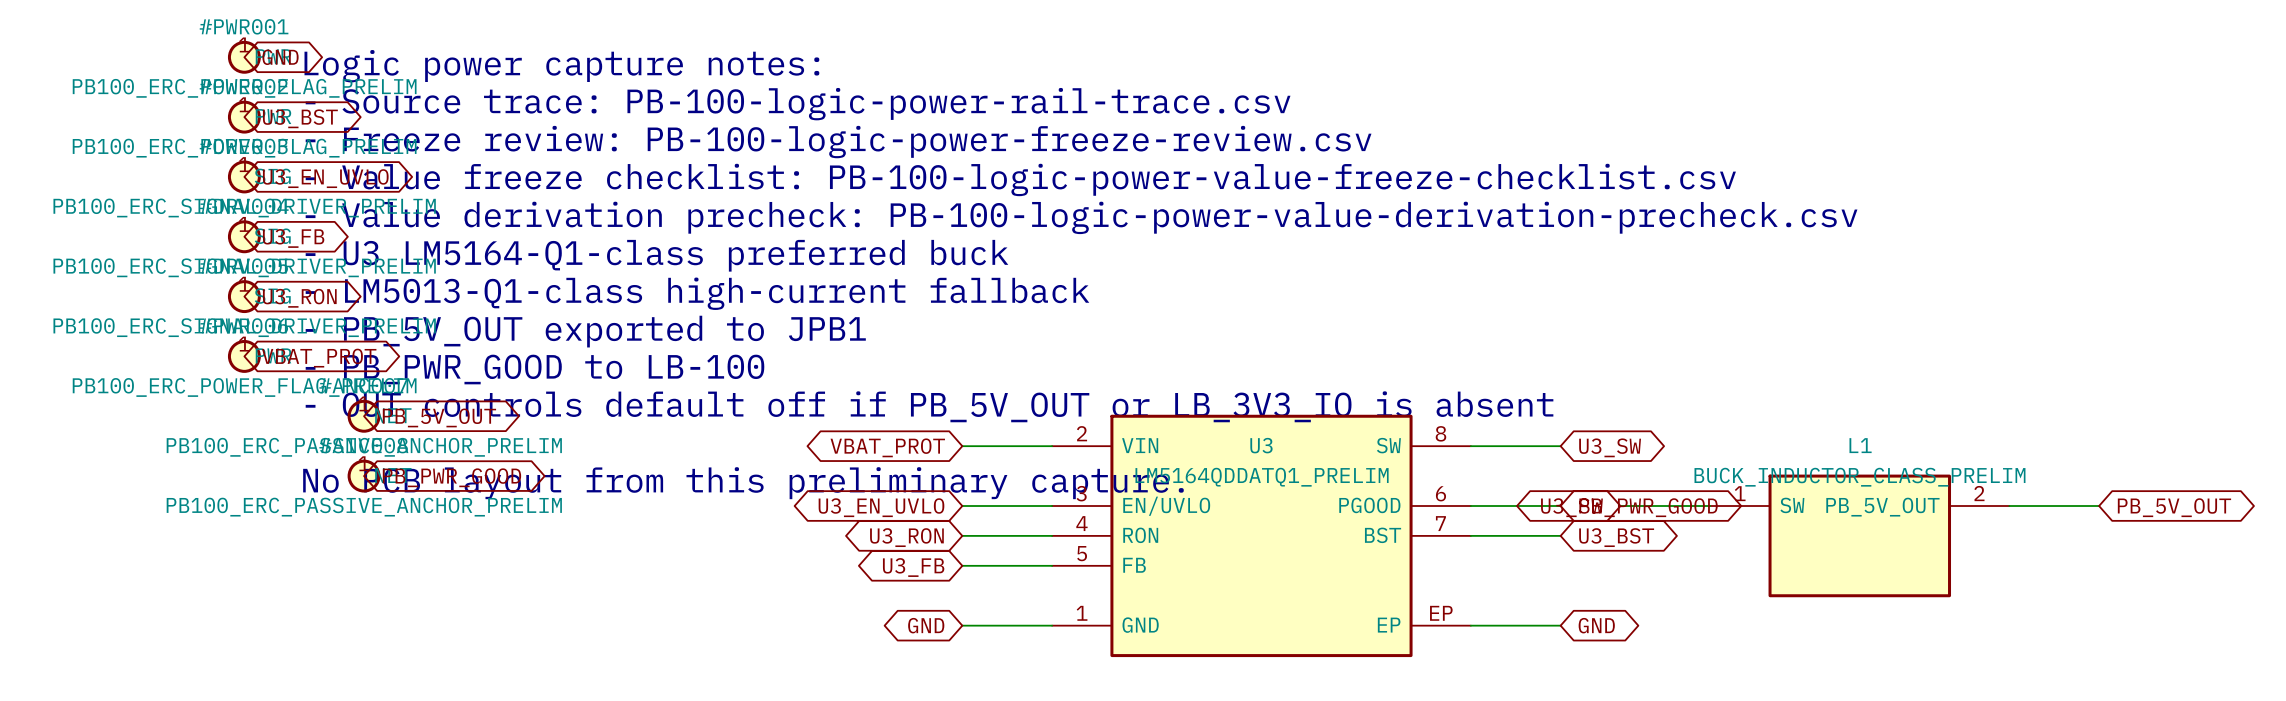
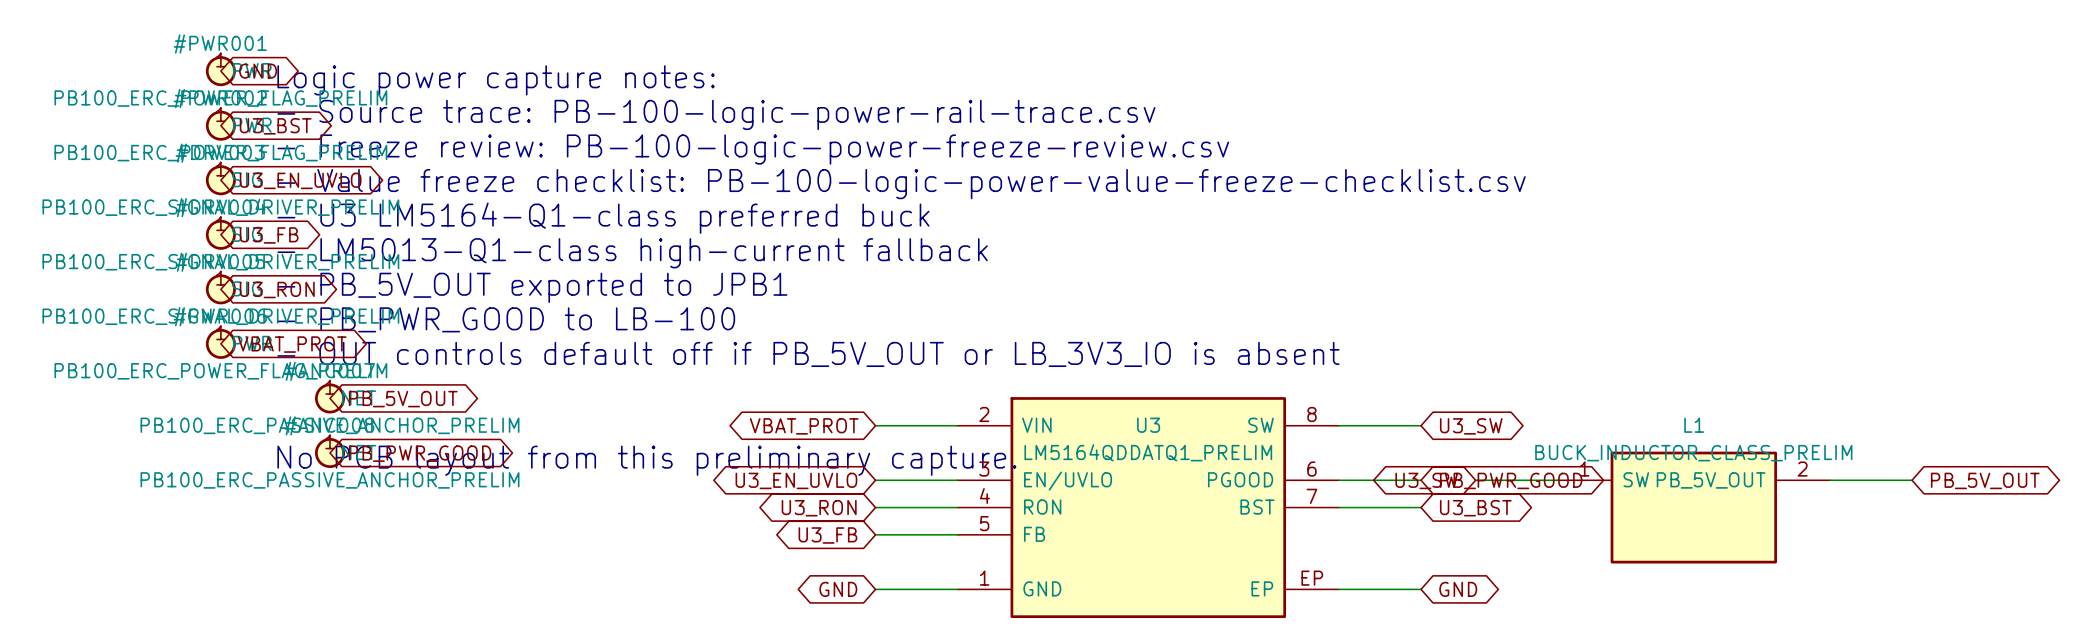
text: - Value derivation precheck: PB-100-logic-power-value-derivation-precheck.csv (1081, 217) -> - U3 LM5164-Q1-class preferred buck (603, 218)
text: - U3 LM5164-Q1-class preferred buck (656, 255) -> - LM5013-Q1-class high-current fallback (632, 253)
text: - LM5013-Q1-class high-current fallback (697, 293) -> - PB_5V_OUT exported to JPB1 (532, 287)
text: - PB_5V_OUT exported to JPB1 (585, 331) -> - PB_PWR_GOOD to LB-100 (506, 319)
text: - PB_PWR_GOOD to LB-100 (534, 369) -> - OUT controls default off if PB_5V_OUT or LB_3V3_IO is absent (808, 354)
text: - OUT controls default off if PB_5V_OUT or LB_3V3_IO is absent (929, 406) -> none

